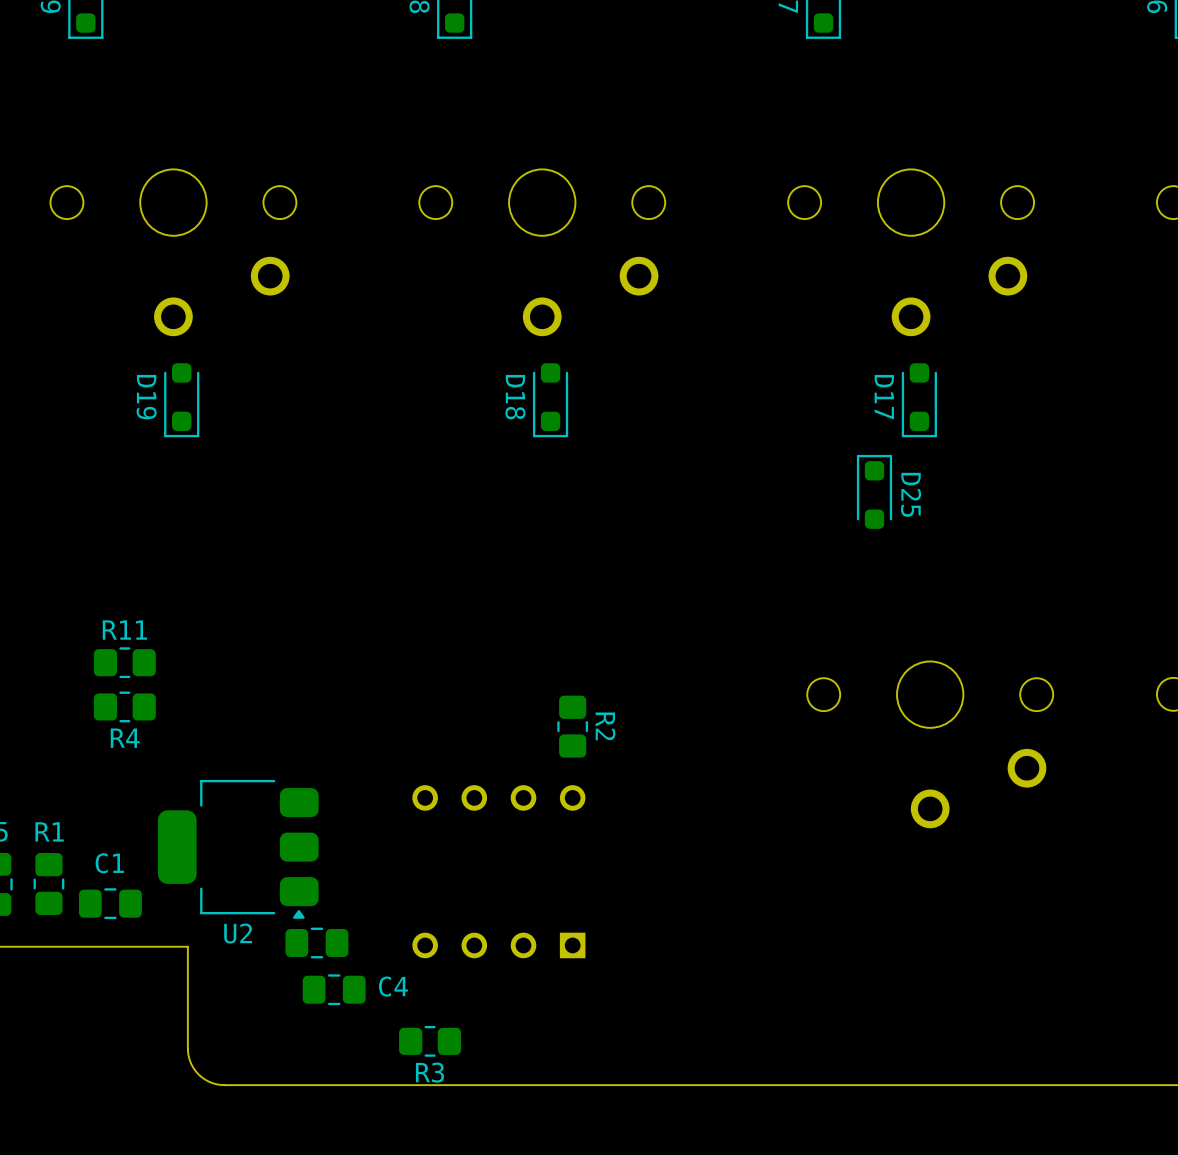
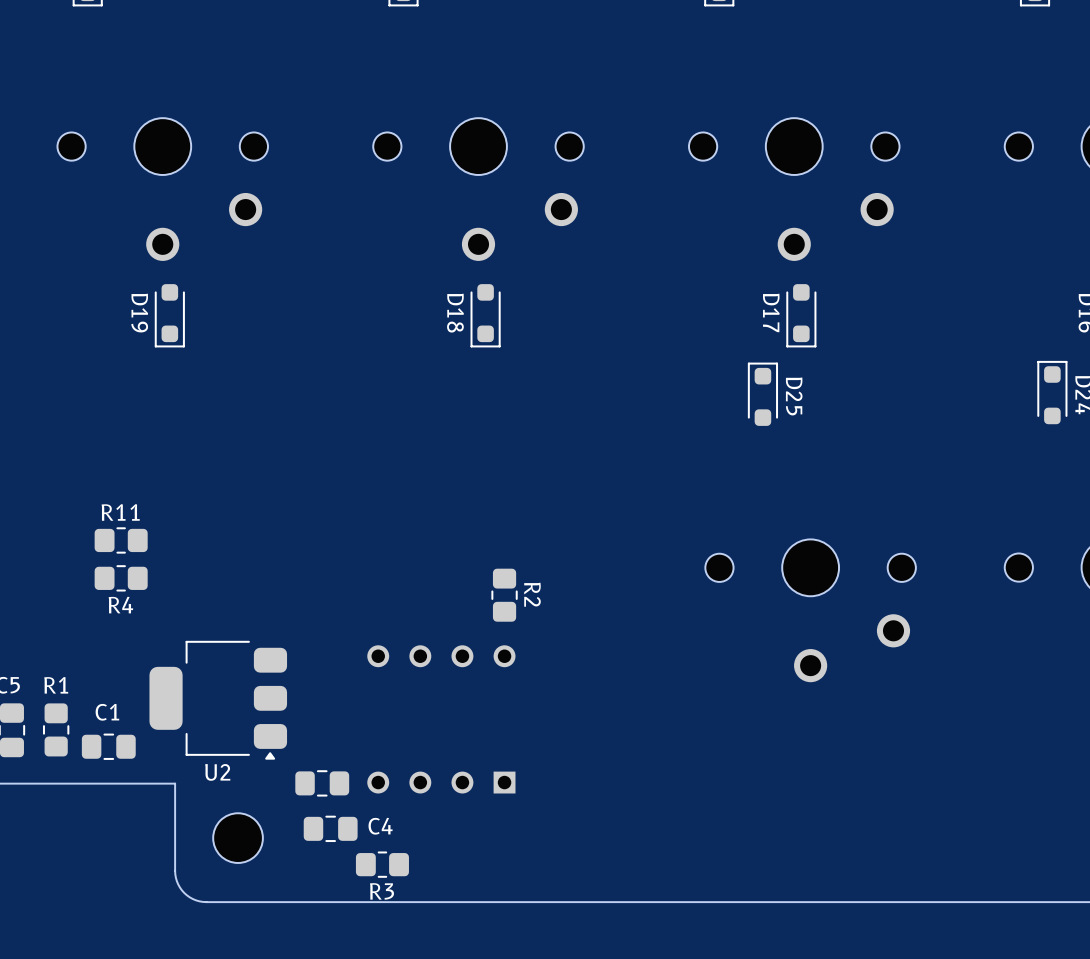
part position: (316, 943) -> (322, 783)
C4 position: (334, 989) -> (330, 828)
part: none -> (238, 838)

